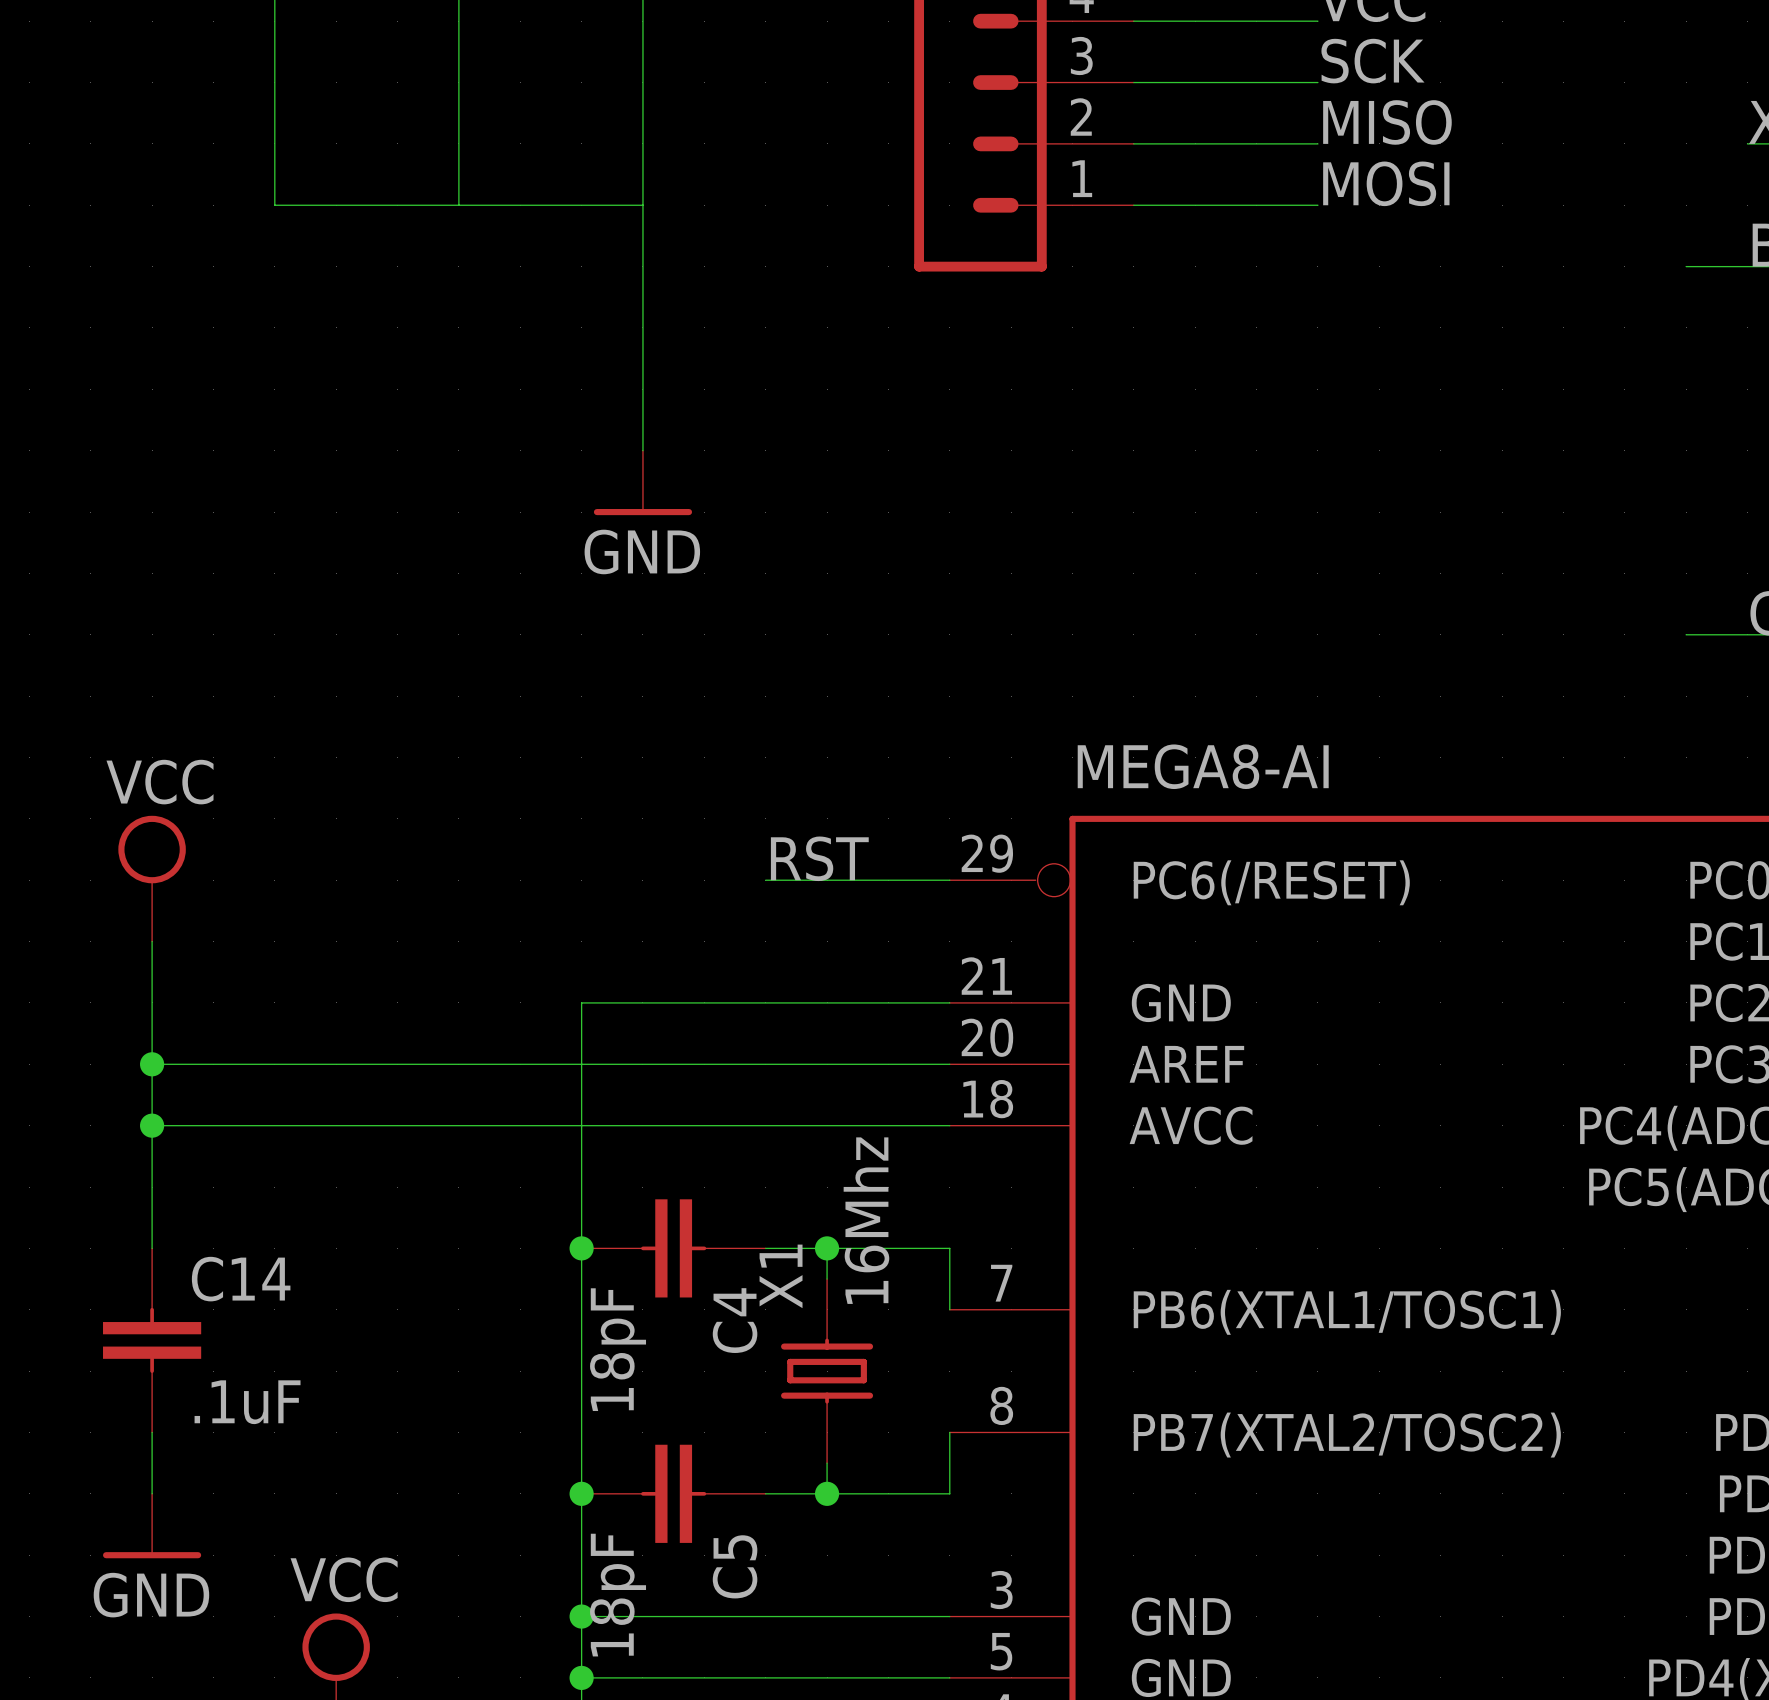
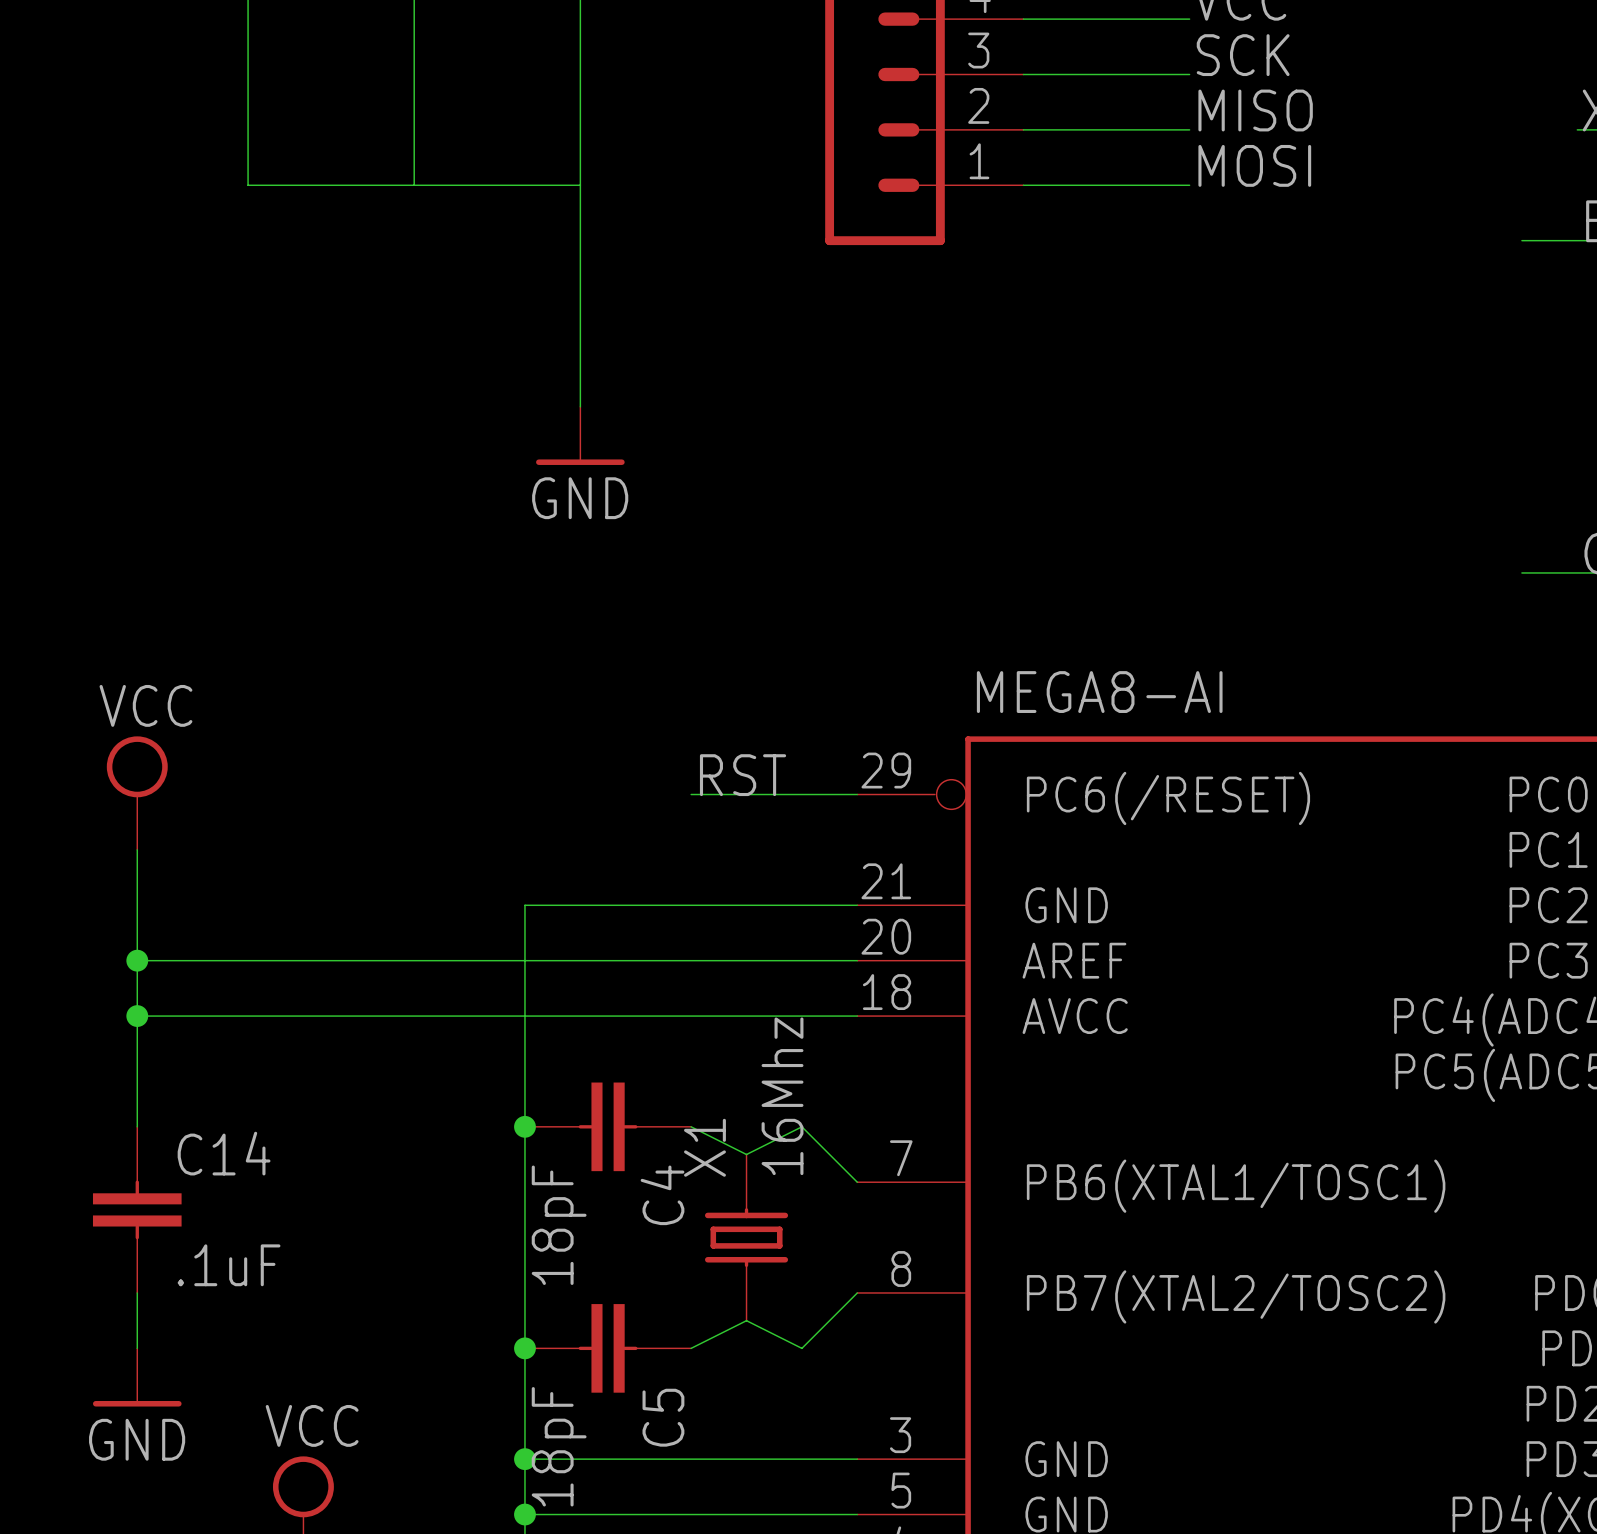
wire: (765, 1248) (949, 1248) (949, 1309) -> (691, 1126) (746, 1154) (801, 1126) (857, 1182)
wire: (827, 1248) (827, 1279) -> none
junction: (827, 1248) -> none
wire: (949, 1432) (949, 1493) (765, 1493) -> (857, 1292) (801, 1348) (746, 1320) (691, 1348)
wire: (827, 1463) (827, 1493) -> none
junction: (827, 1493) -> none

